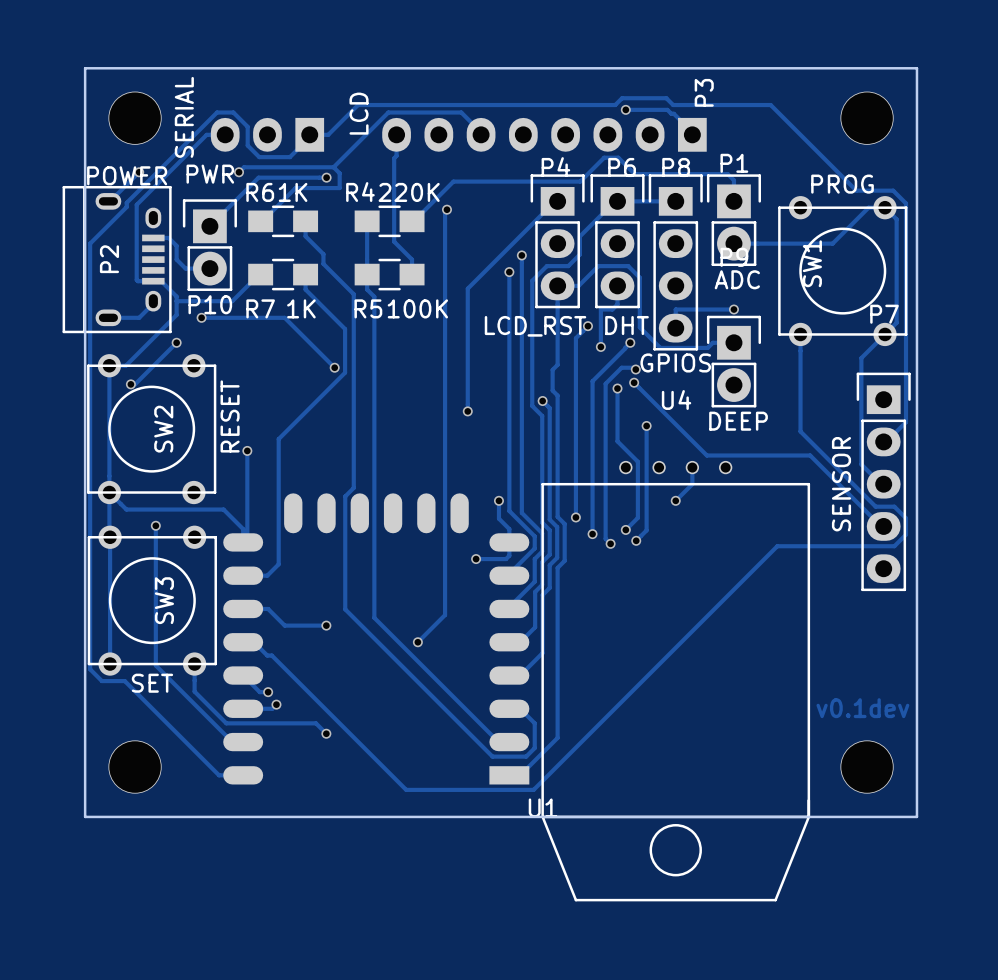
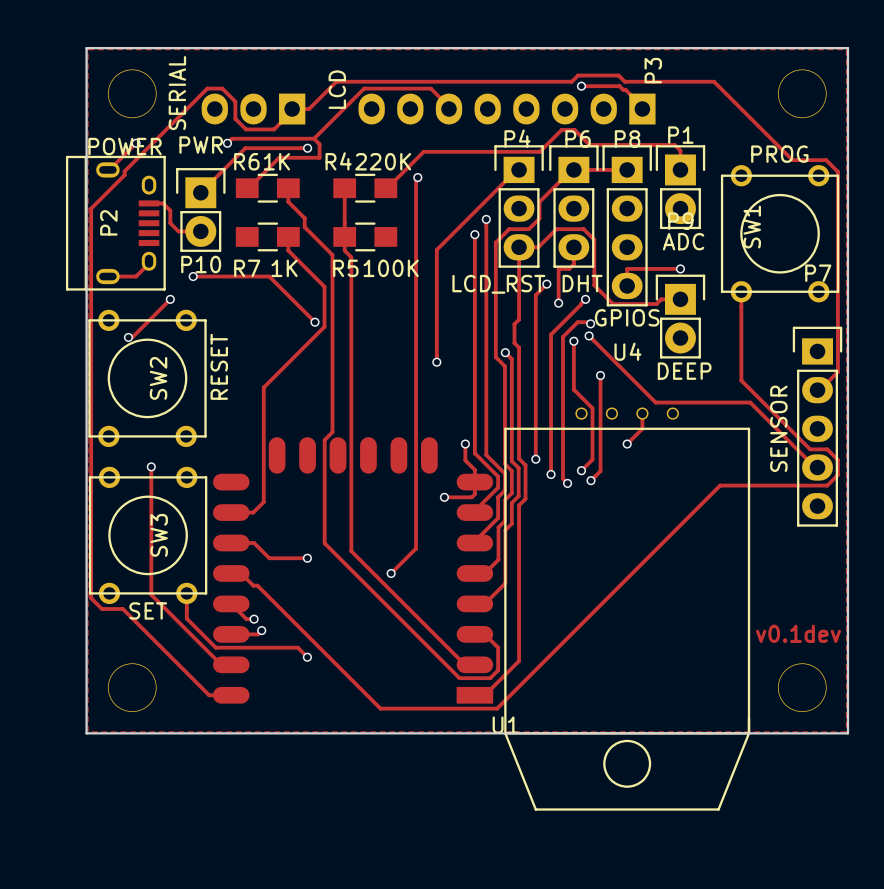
zone outline: none -> (88, 49) (846, 49) (846, 731) (88, 731) (88, 49)
track: (225, 134) (206, 134) (136, 204) (136, 279) (161, 281) (176, 296) (176, 314) (125, 365) (109, 365) (110, 664) -> none
track: (396, 134) (396, 155) (394, 158) (394, 241) (412, 259) (412, 274) -> none
track: (733, 243) (832, 243) (868, 207) (885, 207) (896, 219) (896, 322) (861, 358) (861, 464) (881, 484) (883, 484) -> none
track: (260, 274) (232, 301) (176, 301) -> none
track: (247, 450) (247, 538) (243, 542) (243, 529) (223, 509) (126, 509) (109, 492) -> none
via: (247, 450) -> none

